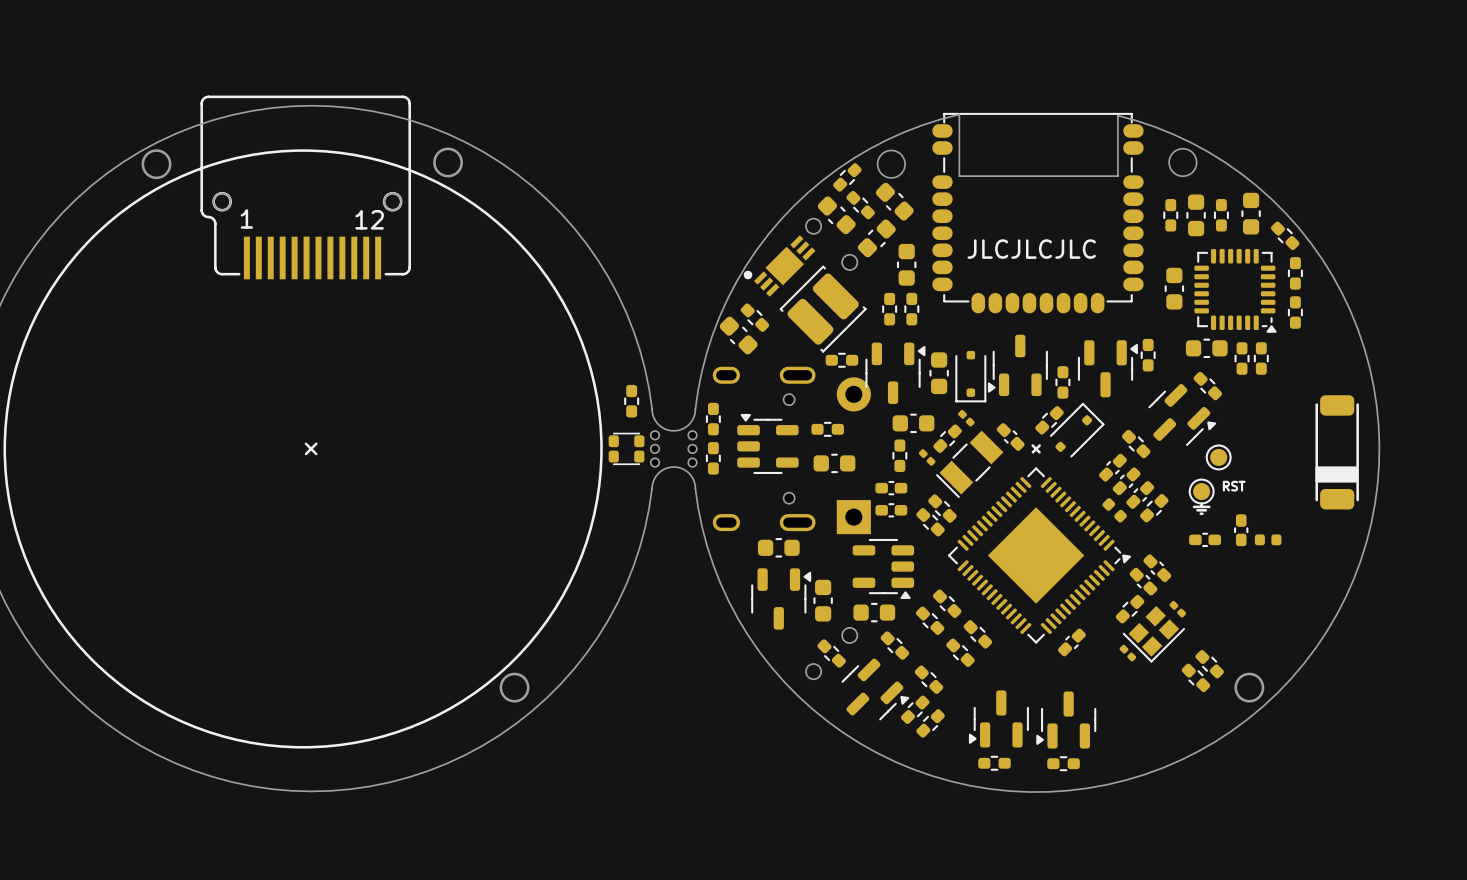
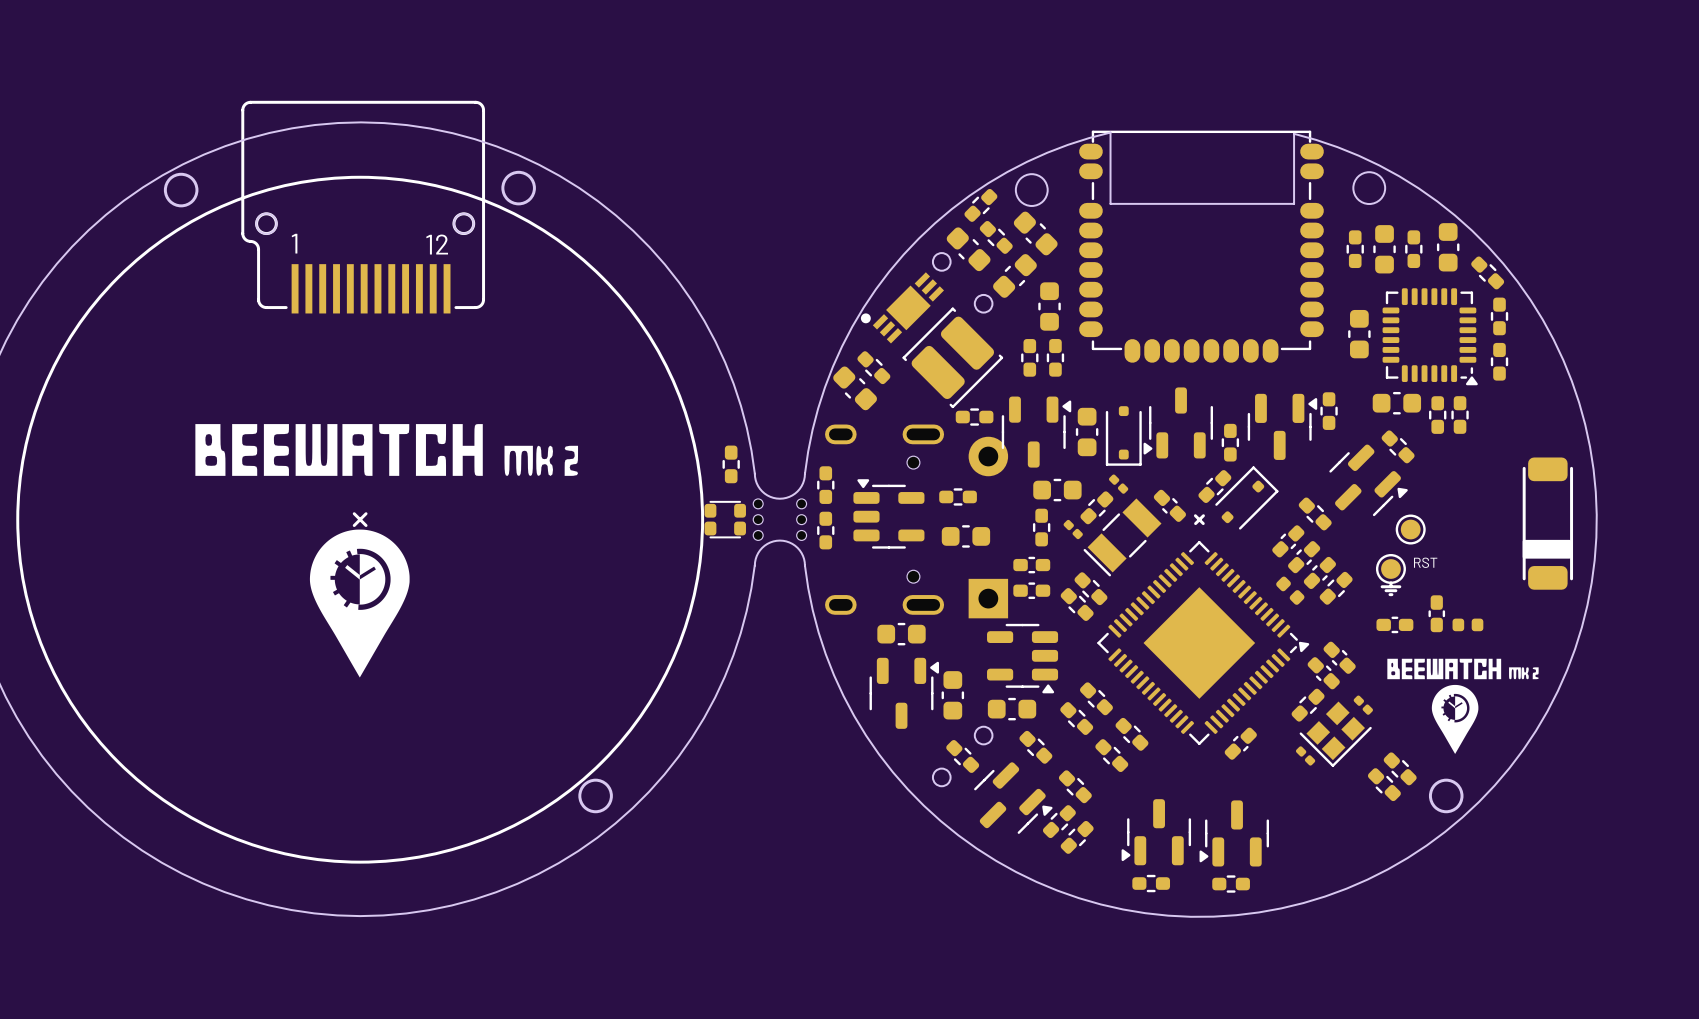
drawing: [3, 149, 603, 749] -> none
part: (305, 187) -> none
round board edge: [212, 192, 232, 212] -> none
round board edge: [383, 192, 403, 212] -> none
text: JLCJLCJLC (1031, 249) -> none
drawing: none -> [195, 424, 579, 476]
part: none -> (360, 482)
drawing: none -> [309, 529, 410, 678]
drawing: none -> [1387, 658, 1539, 754]

